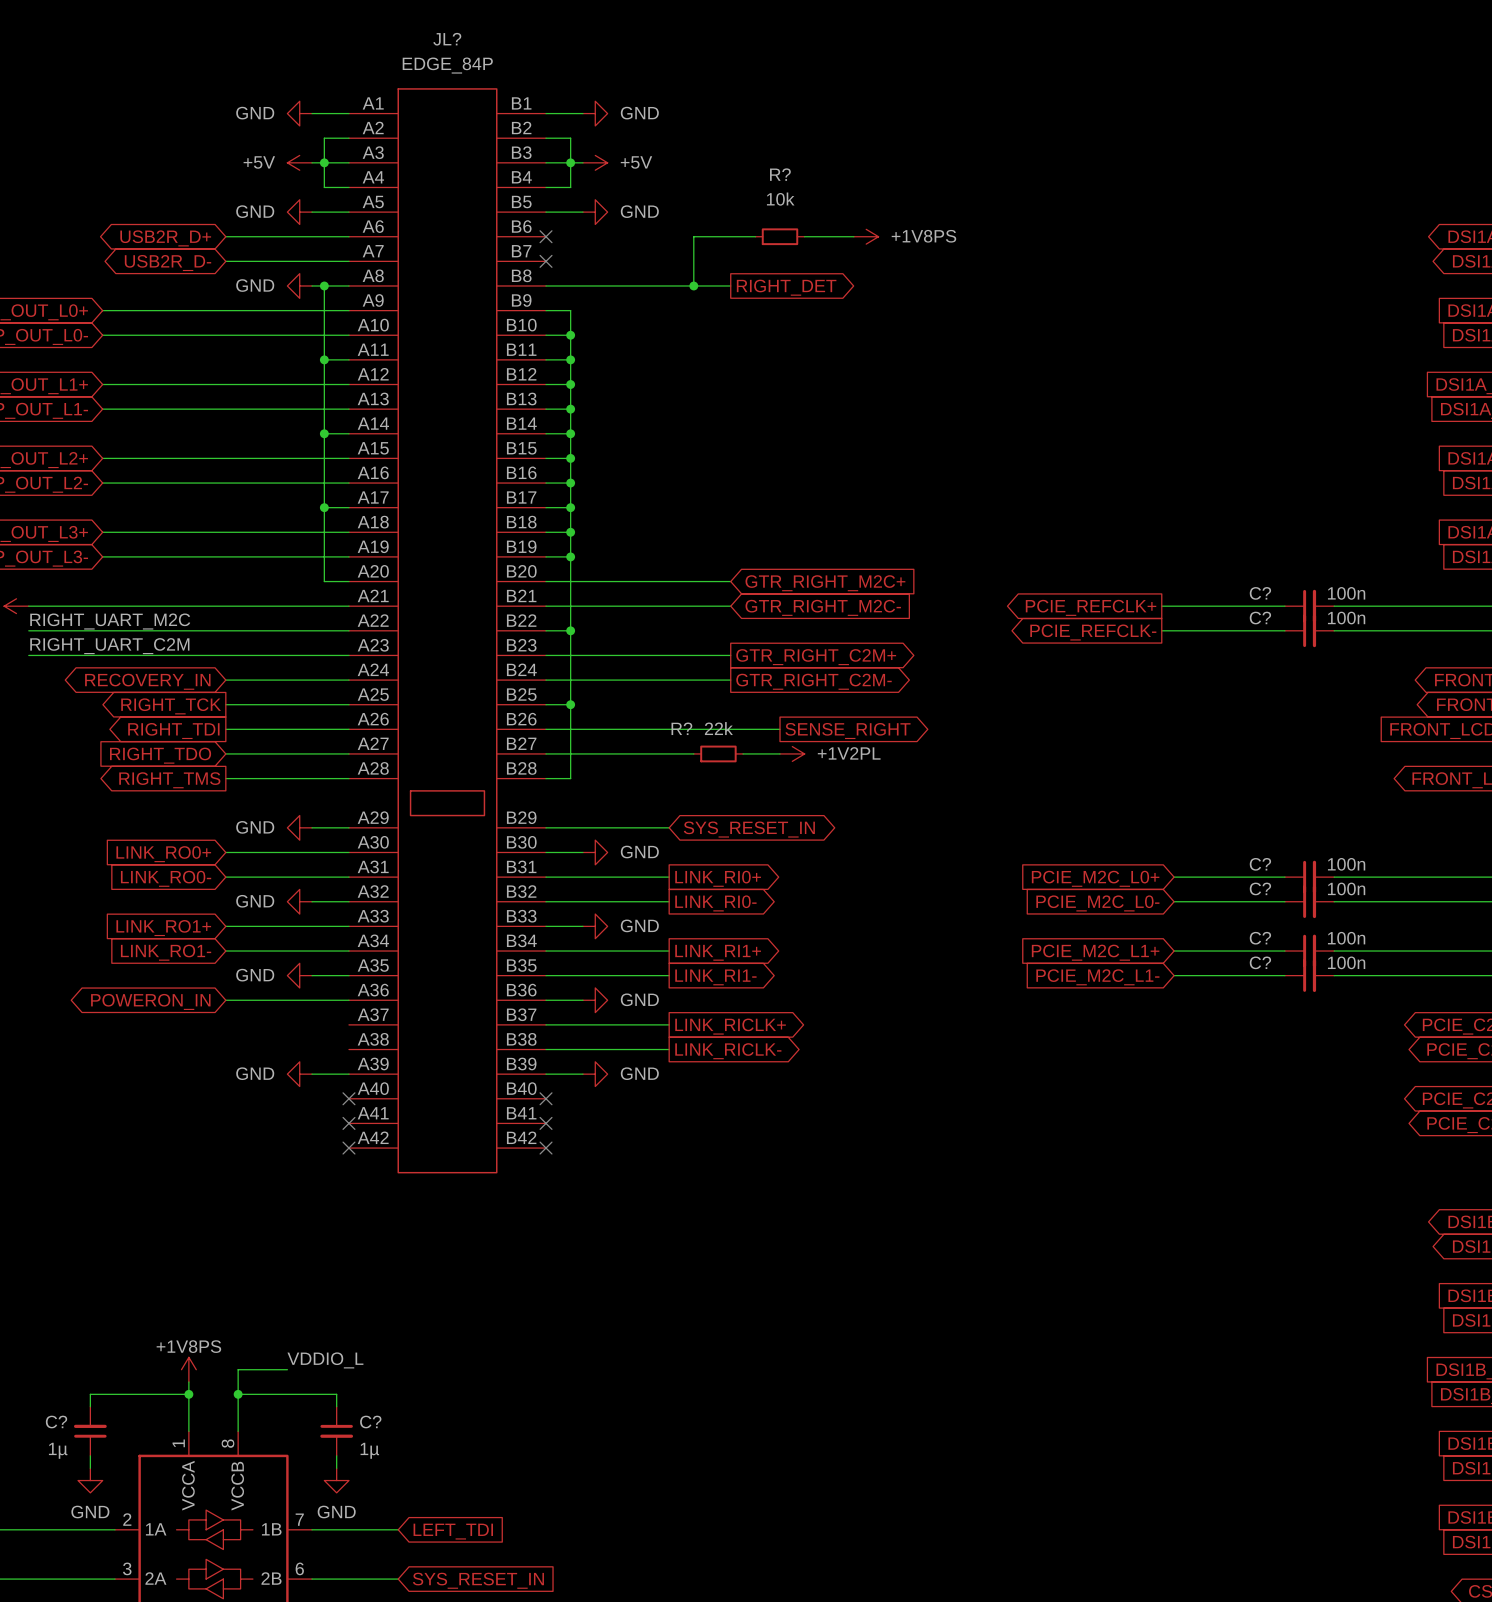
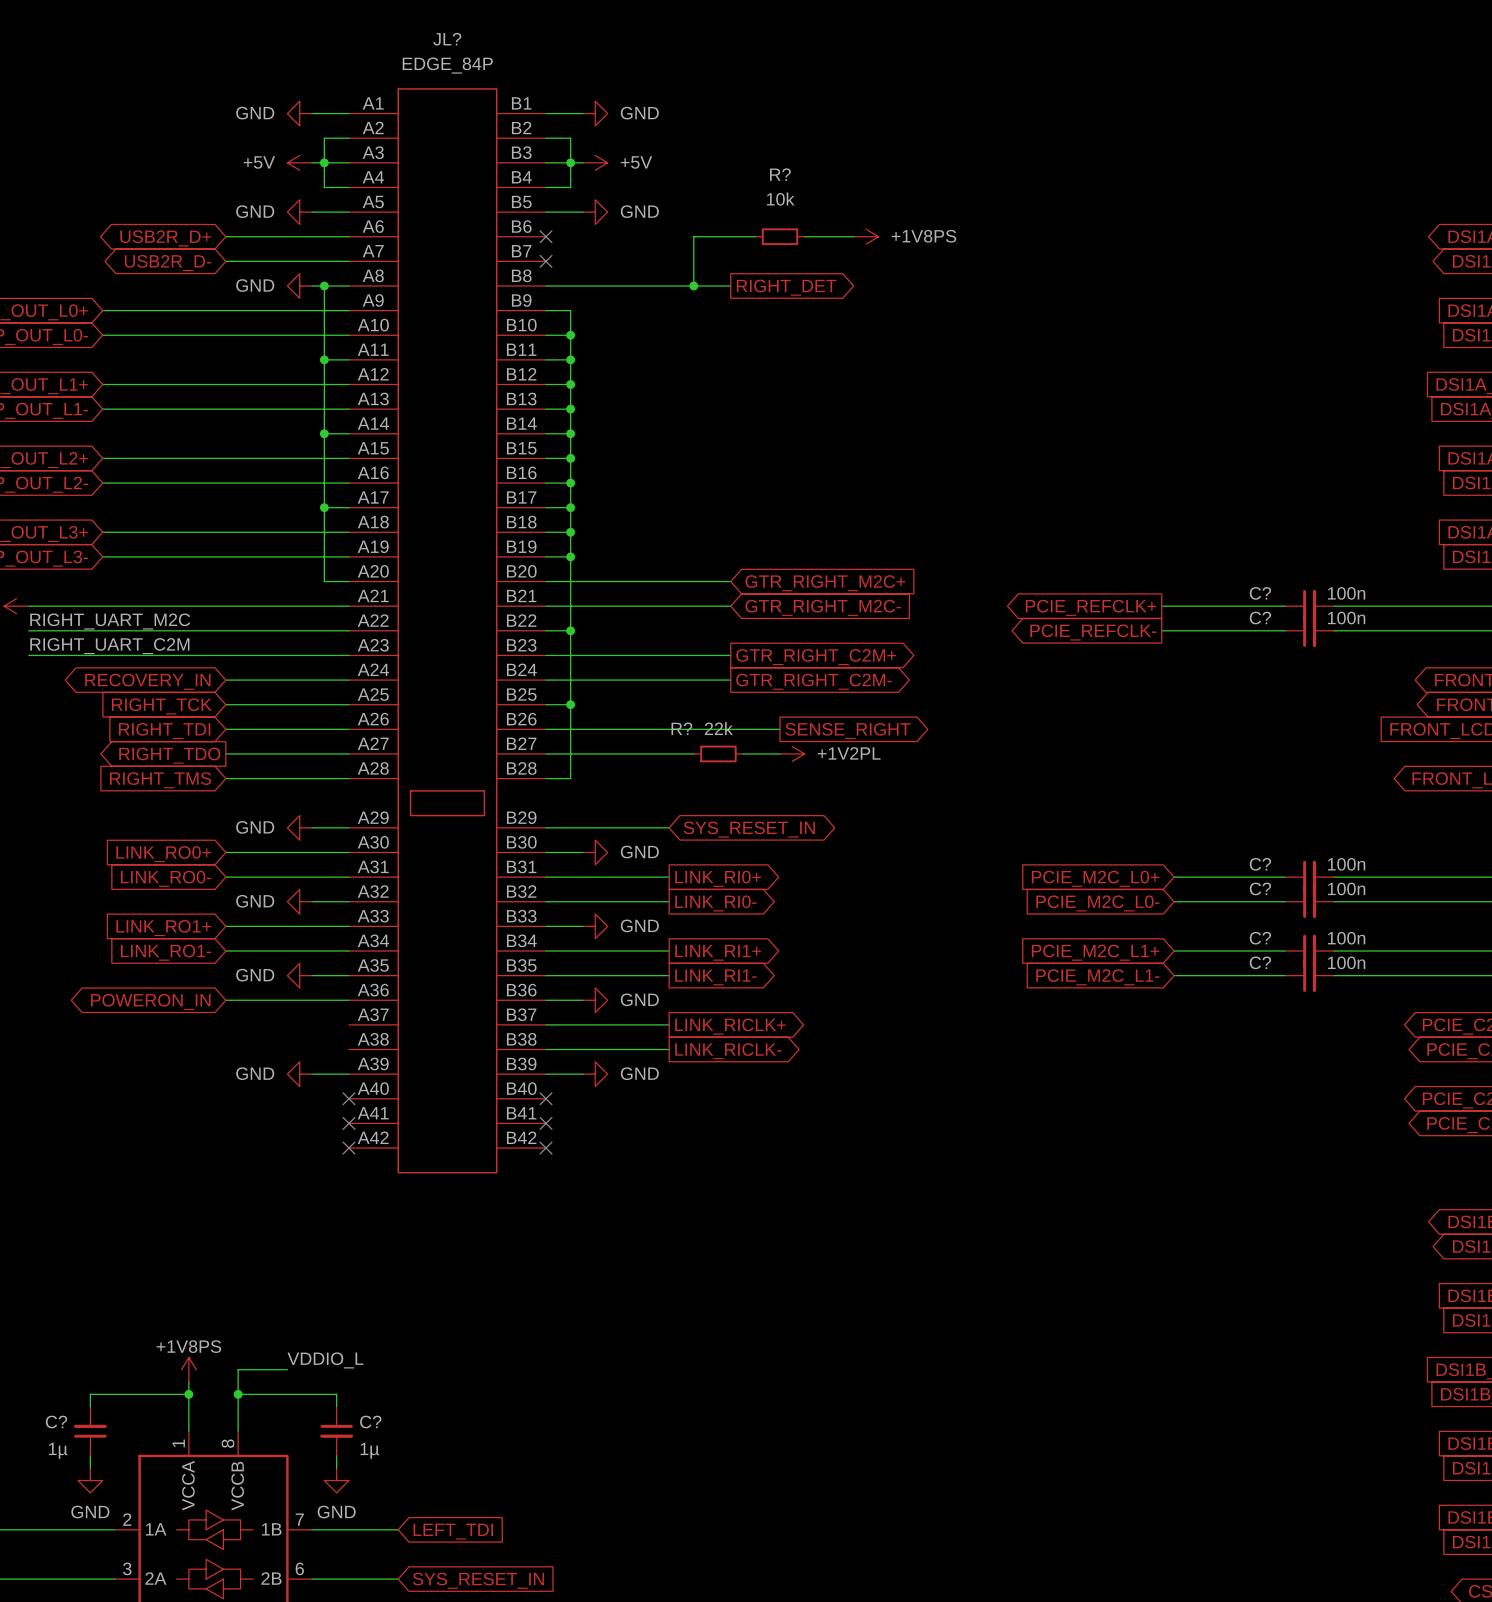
global label shape: output (171, 706) -> input (161, 706)
global label shape: output (173, 731) -> input (164, 731)
global label shape: input (160, 755) -> output (169, 755)
global label shape: output (169, 780) -> input (160, 780)

